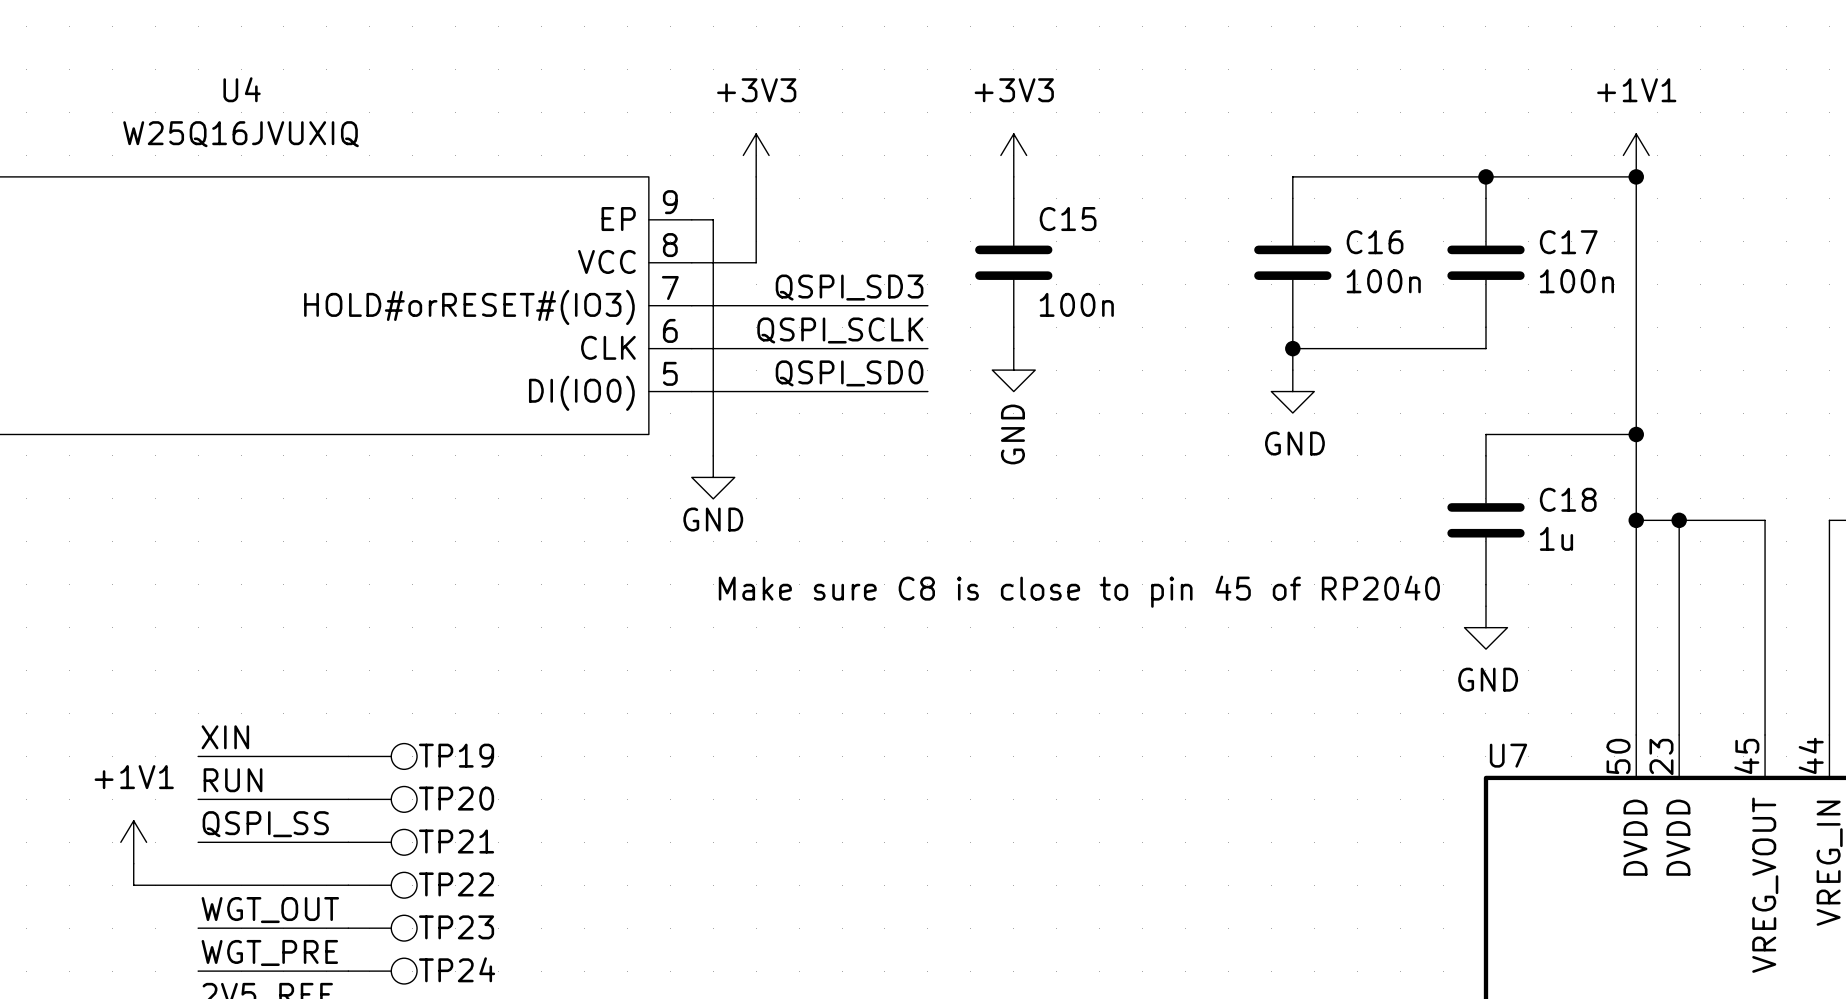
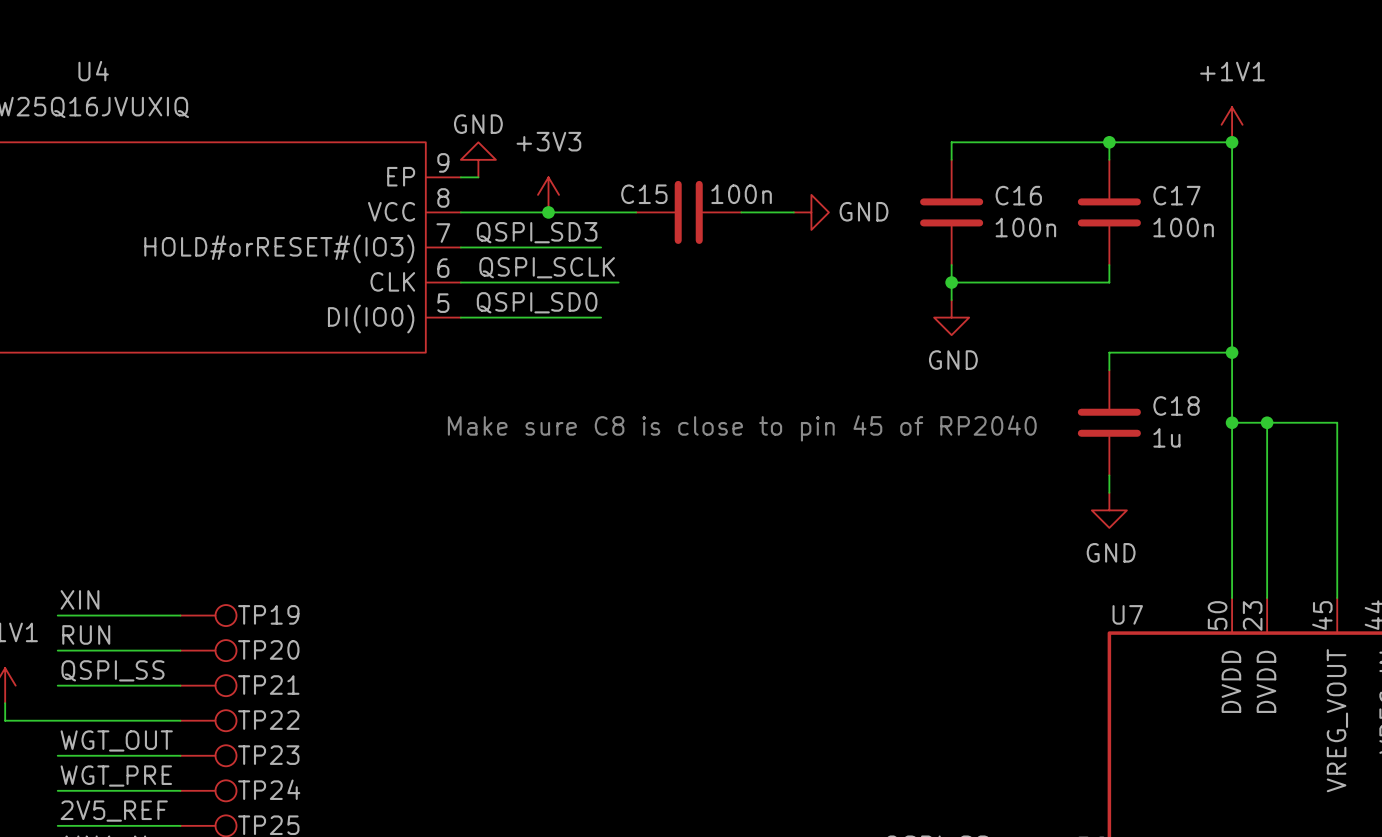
power symbol position: +3V3 (756, 155) -> +3V3 (548, 194)
power symbol: +3V3 (1013, 155) -> none
wire: (756, 176) (756, 262) -> (636, 212) (513, 212)
wire: (1013, 176) (1013, 198) -> none
power symbol: none -> GND (478, 159)
wire: (713, 219) (713, 455) -> none
C15 name position: C15 (1068, 219) -> C15 (644, 194)
junction: none -> (548, 212)
C15 rotation: 0° (1013, 262) -> 90° clockwise (688, 212)
label position: QSPI_SD3 (849, 287) -> QSPI_SD3 (537, 232)
C15 value position: 100n (1076, 304) -> 100n (741, 194)
wire: (863, 305) (927, 305) -> (741, 212) (793, 212)
wire: (1013, 327) (1013, 348) -> none
label position: QSPI_SCLK (840, 330) -> QSPI_SCLK (547, 267)
wire: (884, 348) (927, 348) -> none
power symbol rotation: 0° (1013, 370) -> 90° counterclockwise (811, 212)
power symbol position: GND (1013, 370) -> GND (811, 212)
label position: QSPI_SD0 (849, 373) -> QSPI_SD0 (537, 302)
wire: (863, 391) (927, 391) -> none
power symbol: GND (713, 477) -> none
text position: Make sure C8 is close to pin 45 of RP2040 (1079, 591) -> Make sure C8 is close to pin 45 of RP2040 (742, 428)

